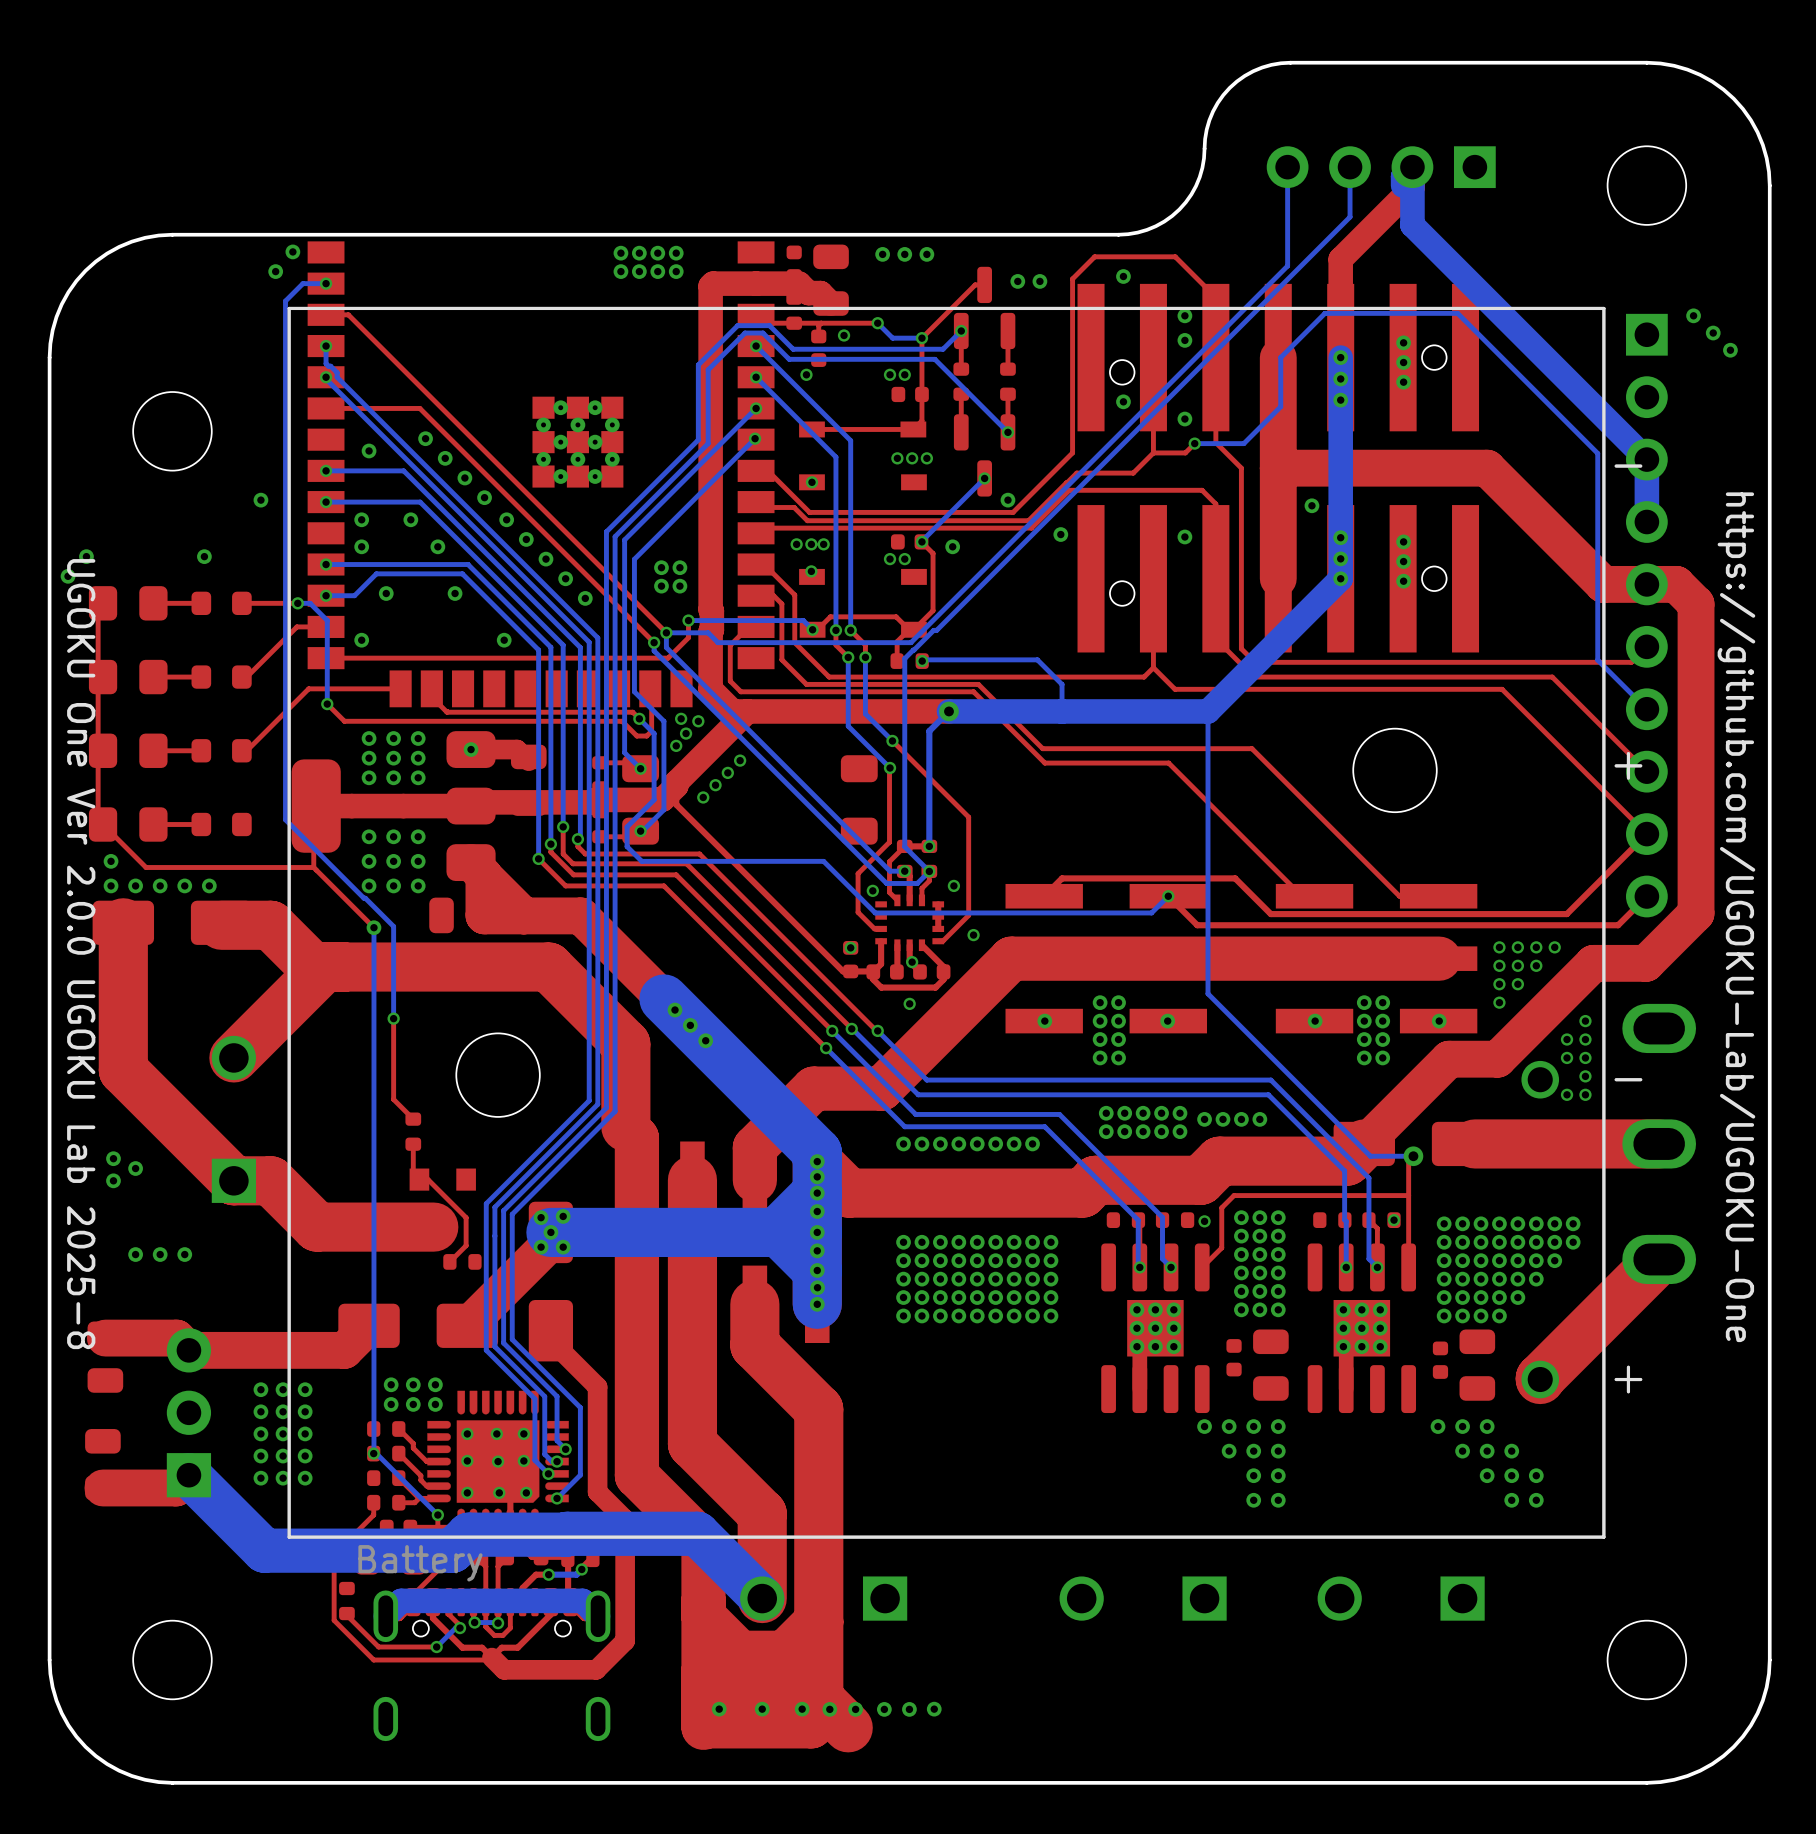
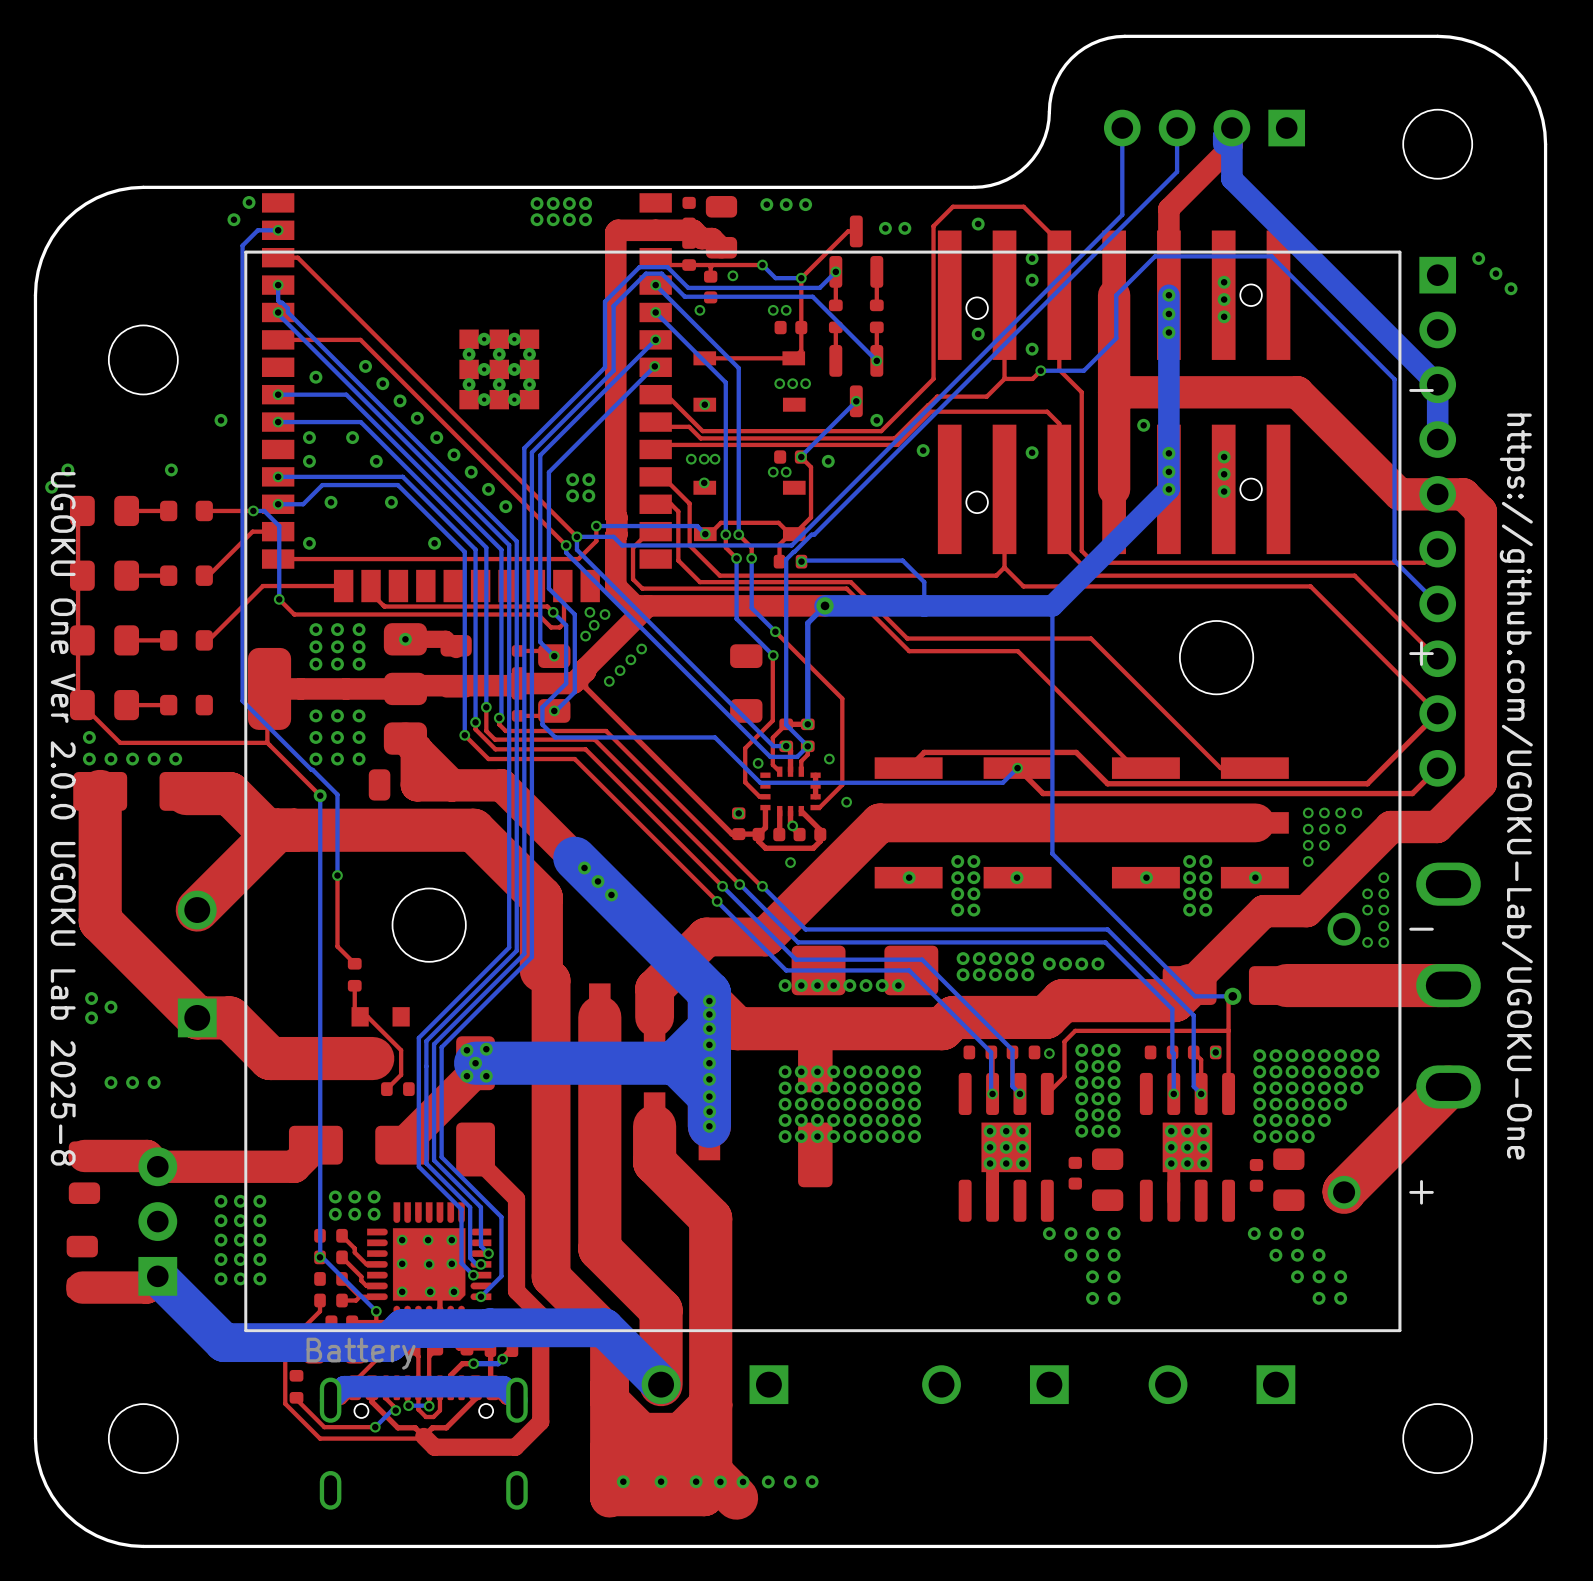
part: none -> (864, 970)
part: none -> (815, 1107)

